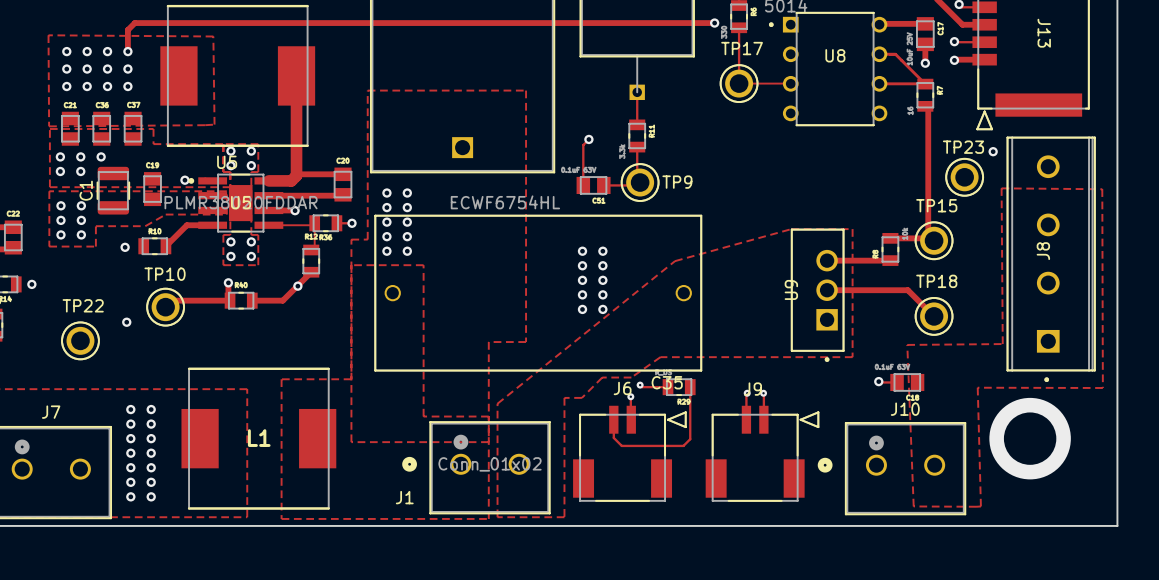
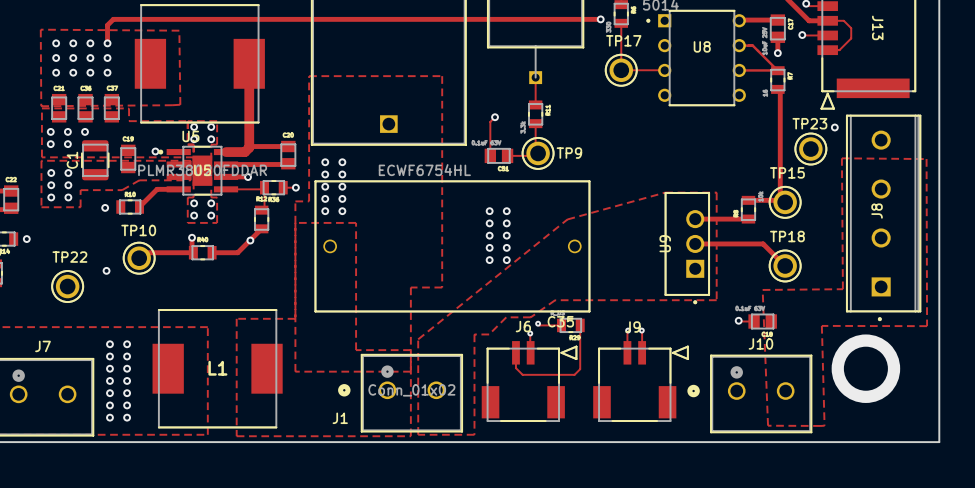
track: (984, 59) (954, 60) -> (827, 50) (839, 50) (851, 38) (851, 28) (843, 20) (827, 20)
via: (954, 60) -> none

